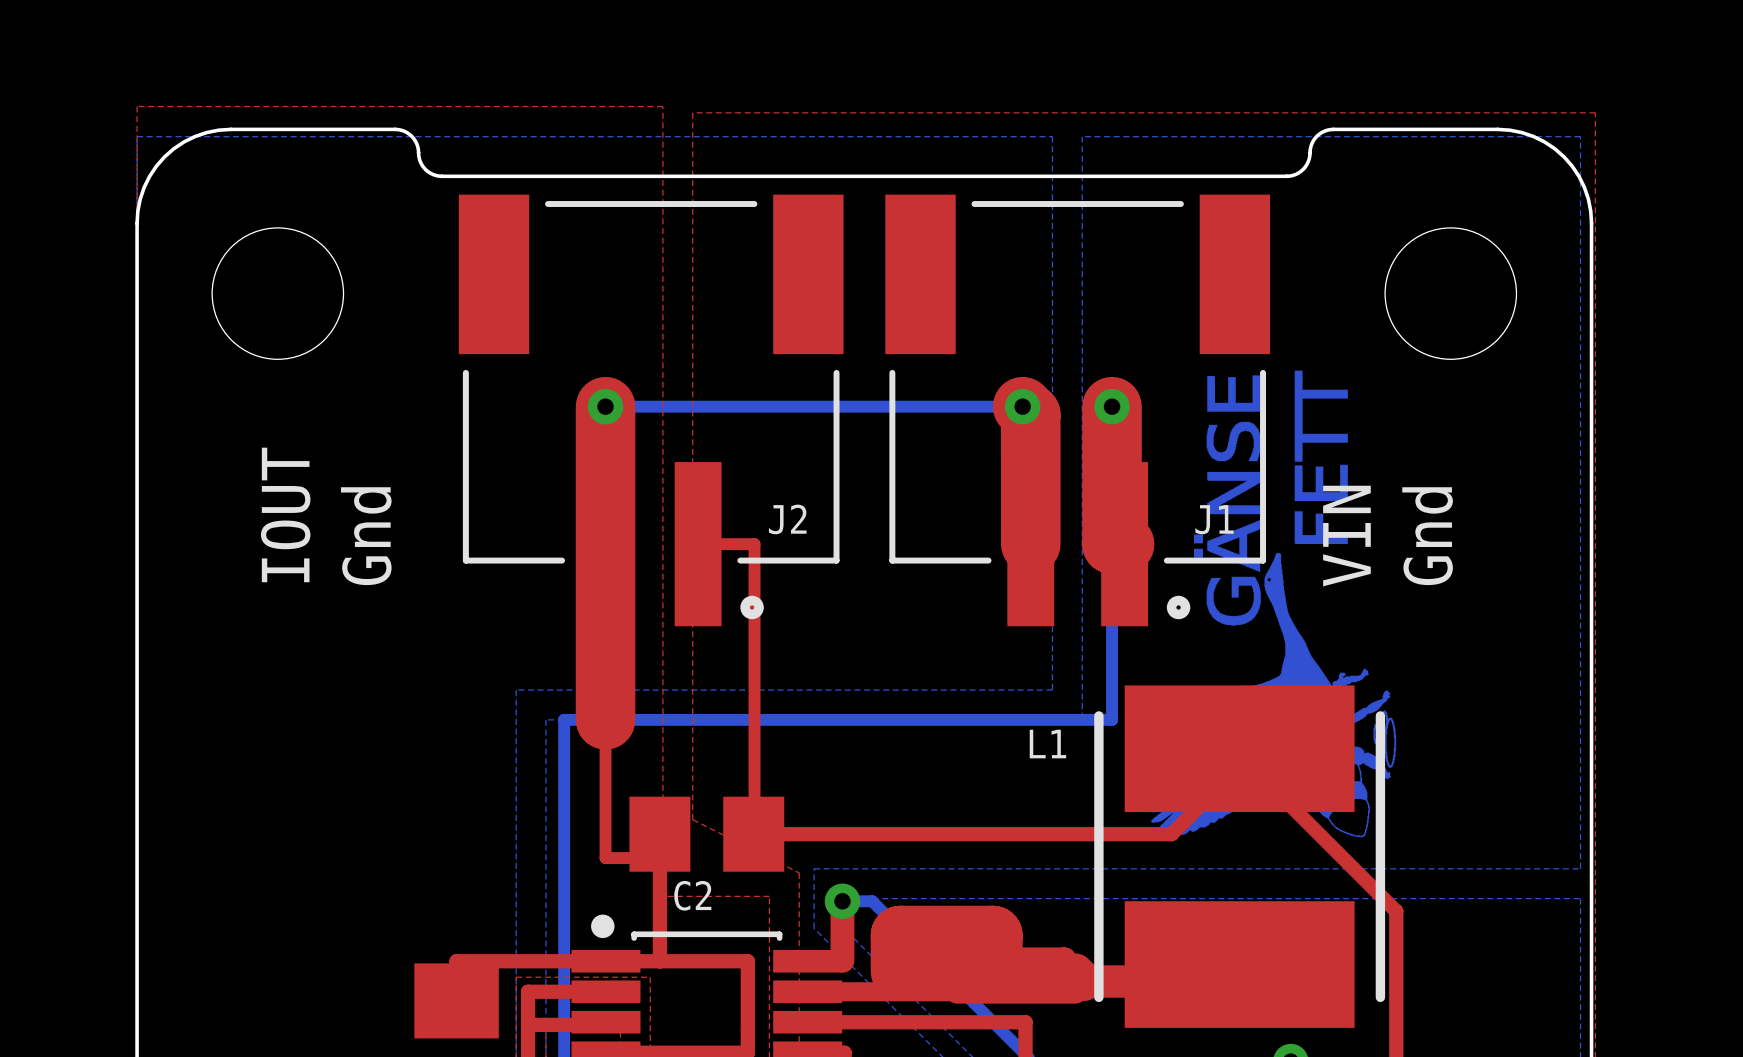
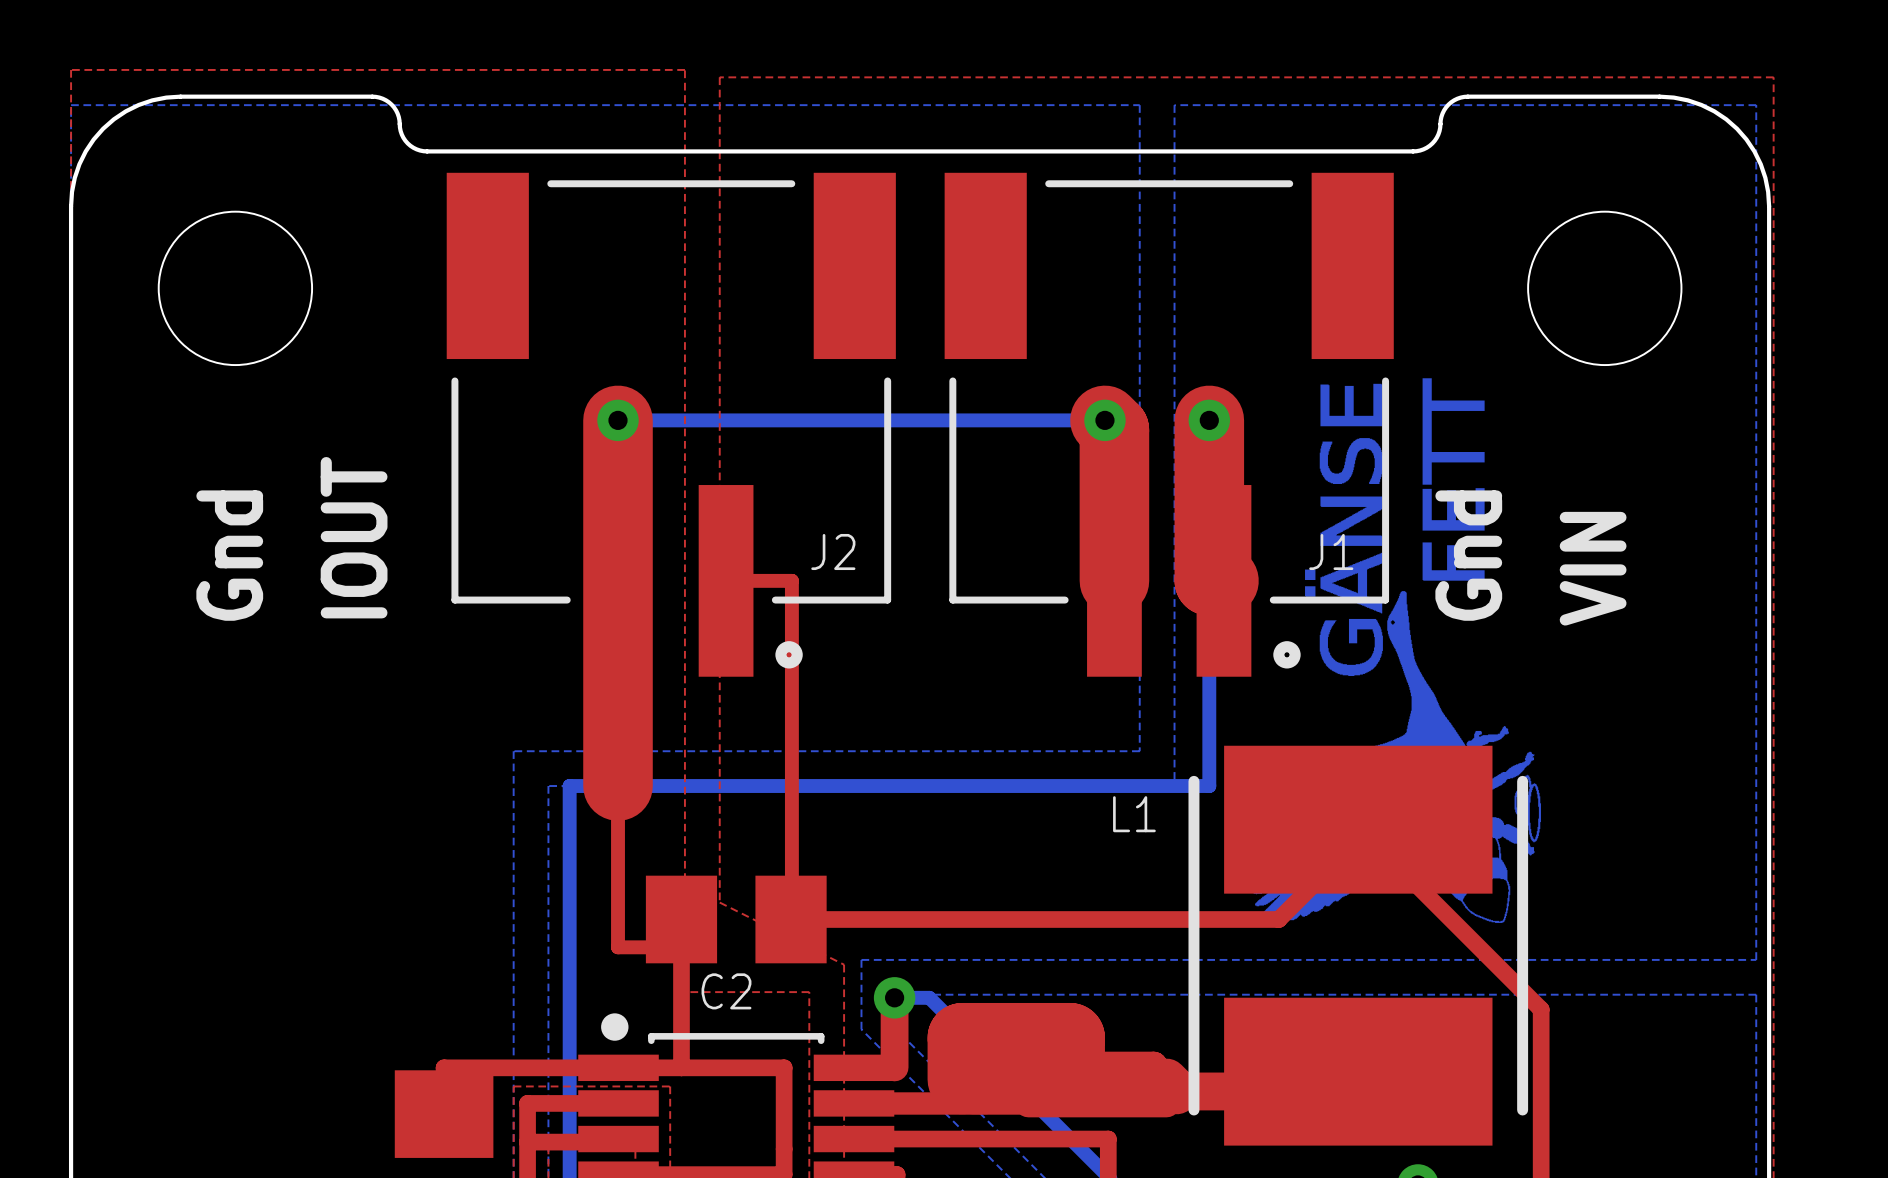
text: IOUT (285, 514) -> Gnd (229, 555)
text: Gnd (366, 536) -> IOUT (354, 537)
text: VIN (1346, 536) -> Gnd (1468, 555)
text: Gnd (1427, 536) -> VIN (1593, 568)

